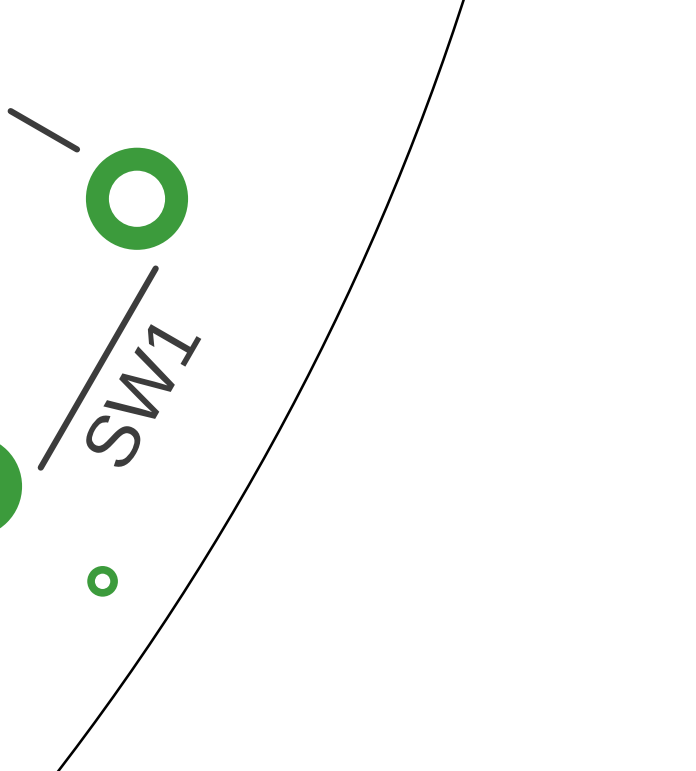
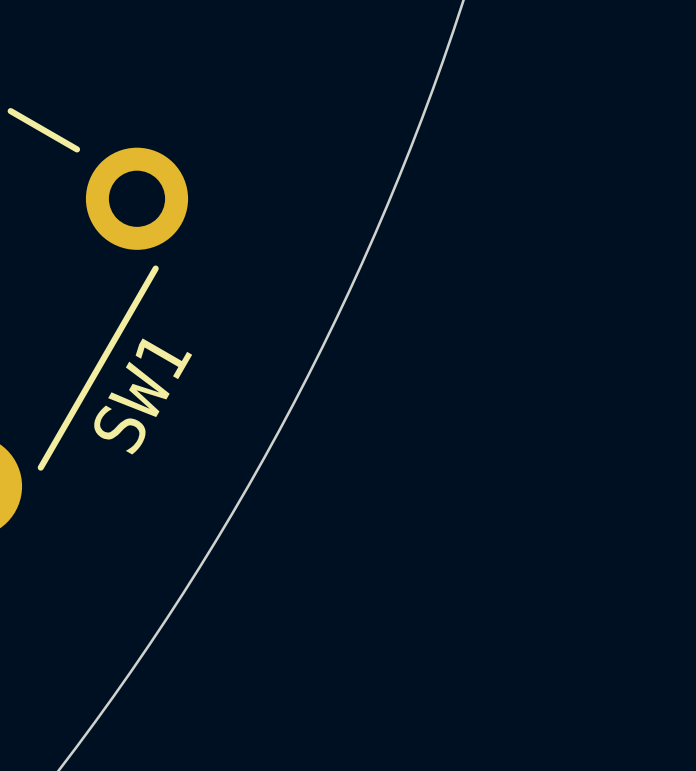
via: (102, 581) -> none

